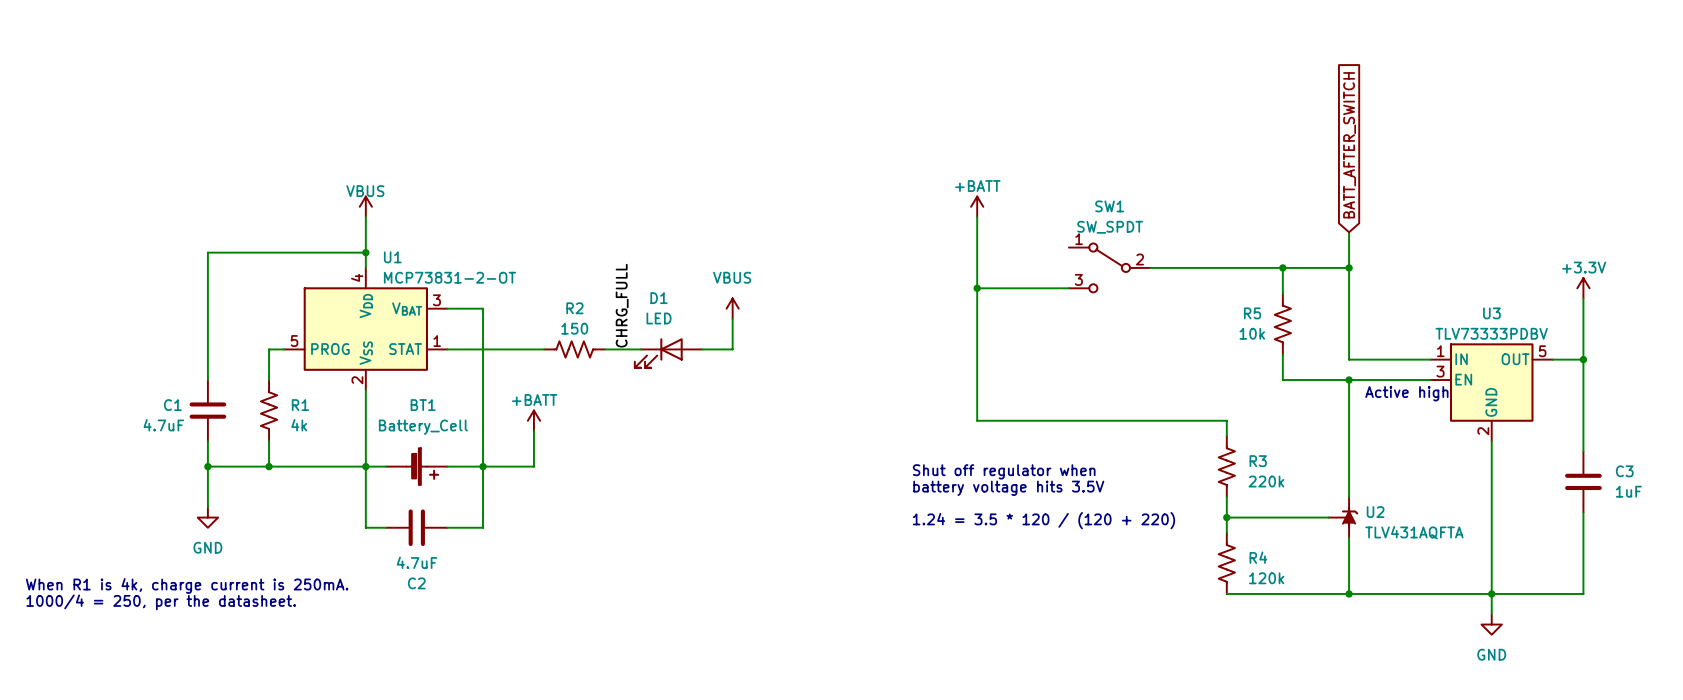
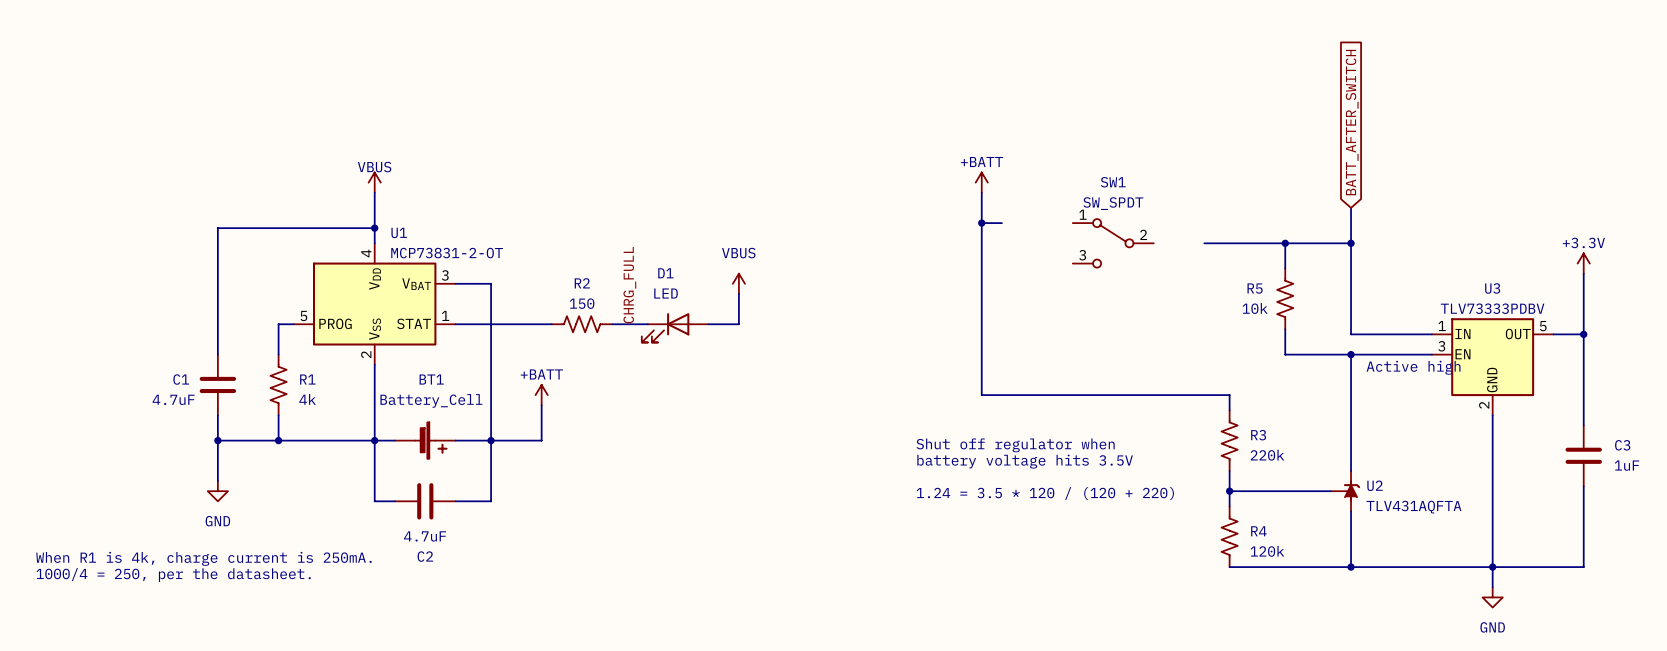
wire: none -> (981, 223) (1001, 223)
wire: (1150, 267) (1201, 267) -> none
wire: (977, 288) (1068, 288) -> none
junction position: (977, 288) -> (981, 223)

